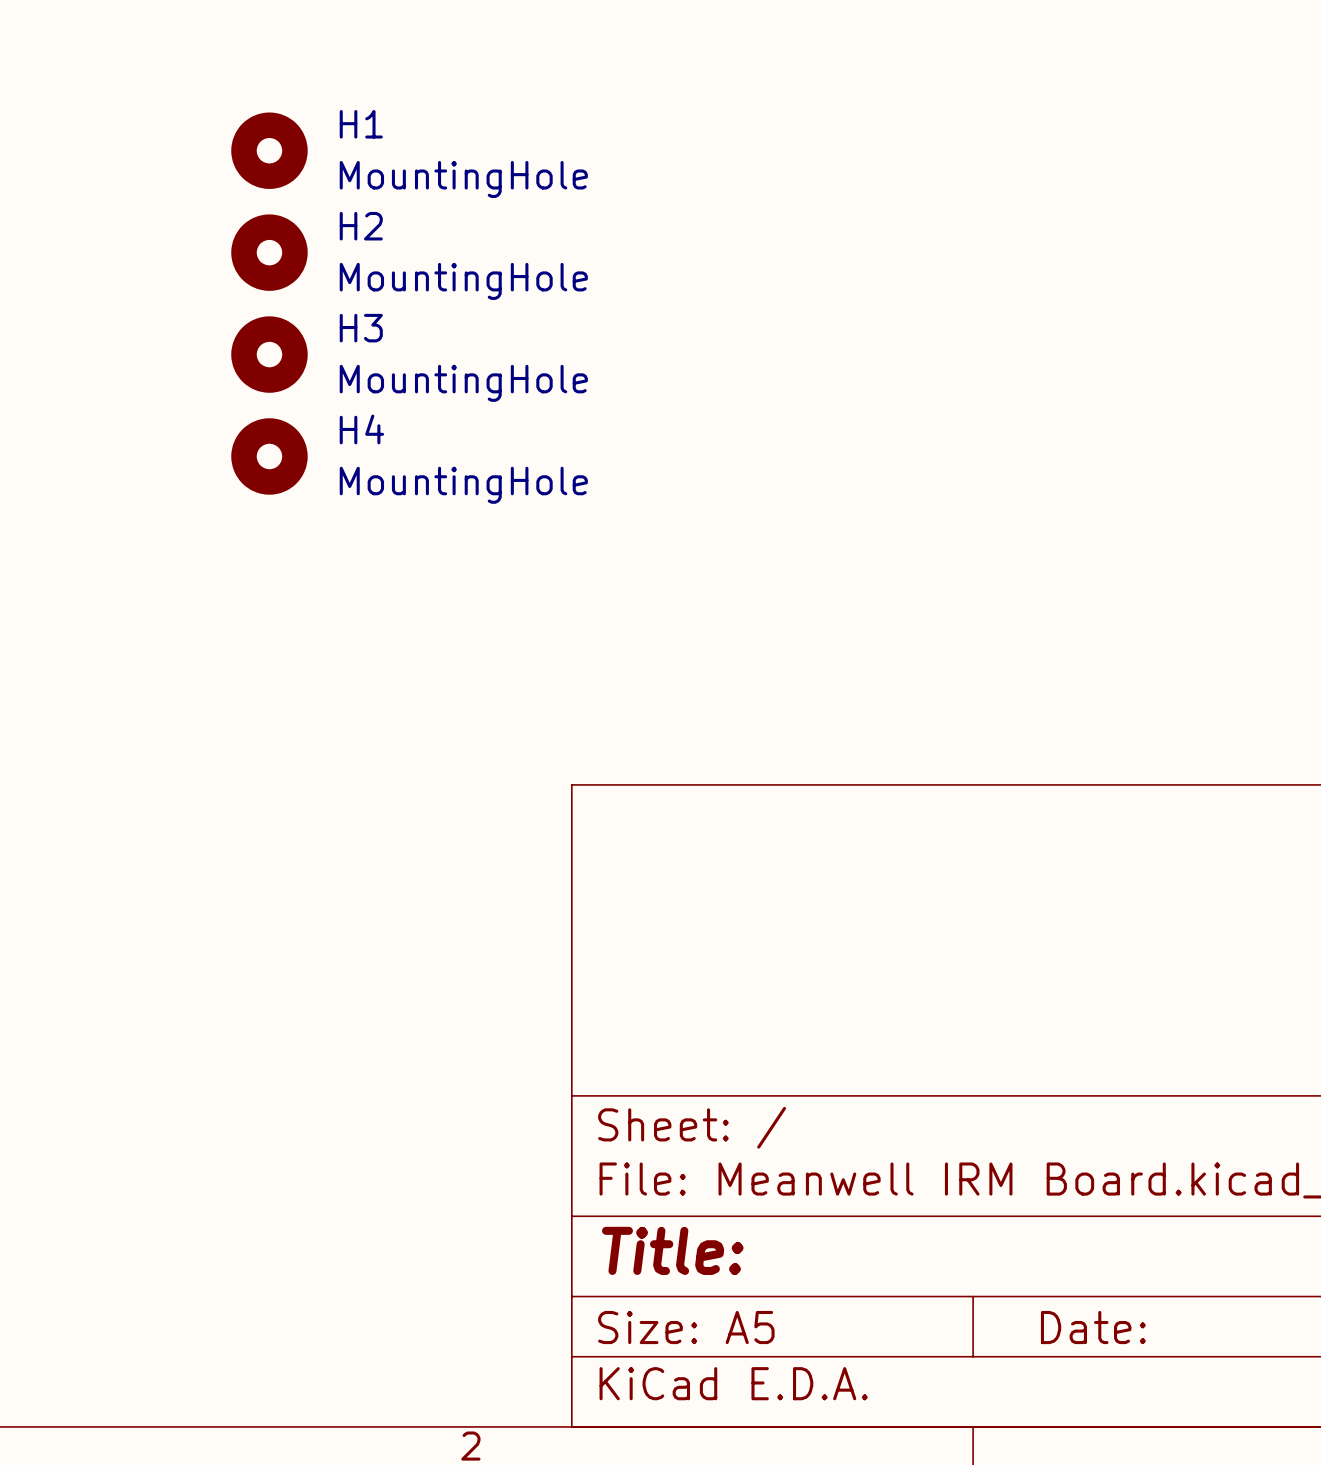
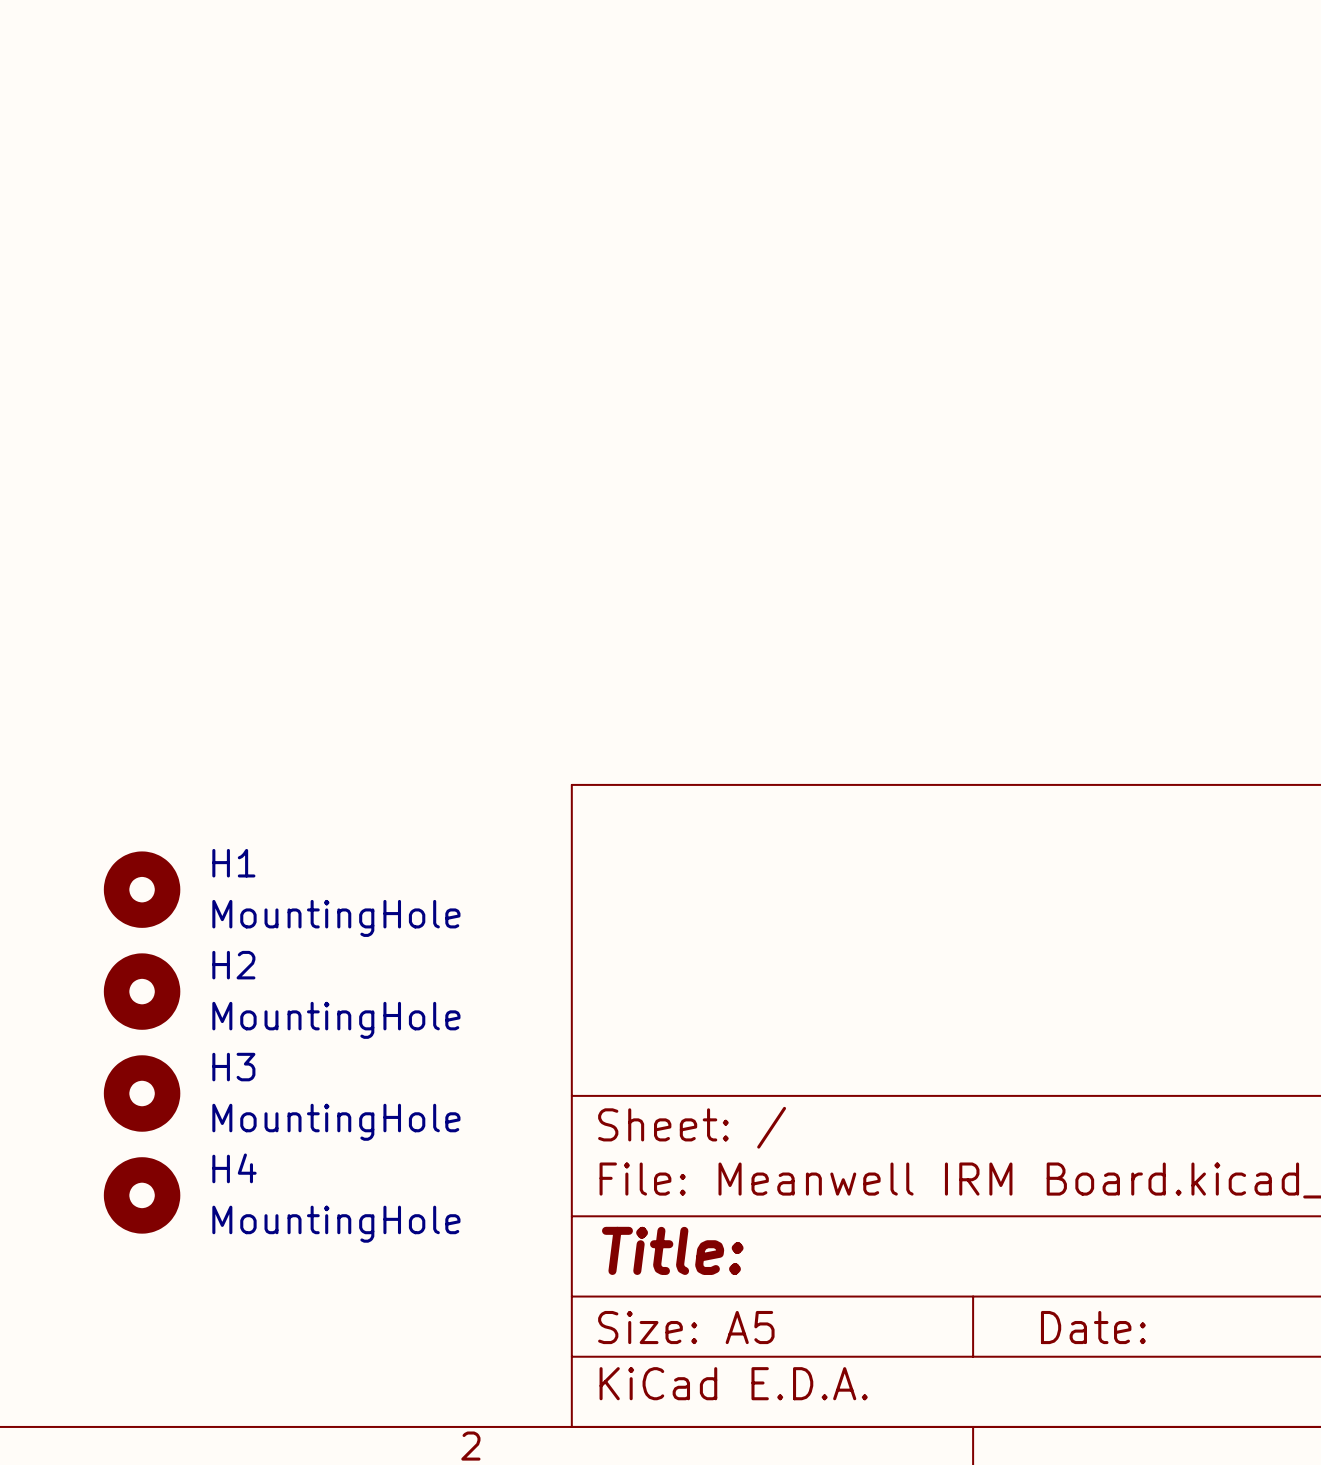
H1 position: (269, 150) -> (142, 889)
H2 position: (269, 252) -> (142, 991)
H3 position: (269, 354) -> (142, 1093)
H4 position: (269, 456) -> (142, 1195)

